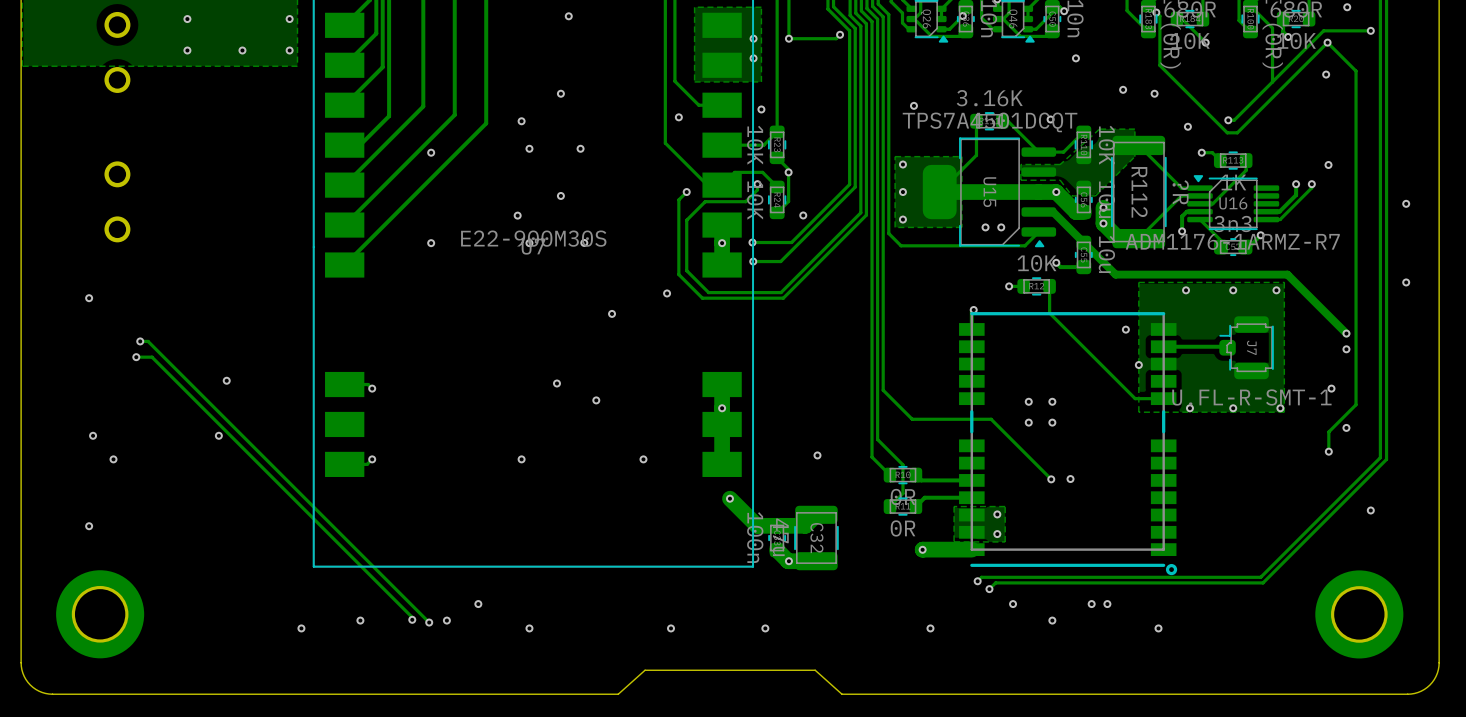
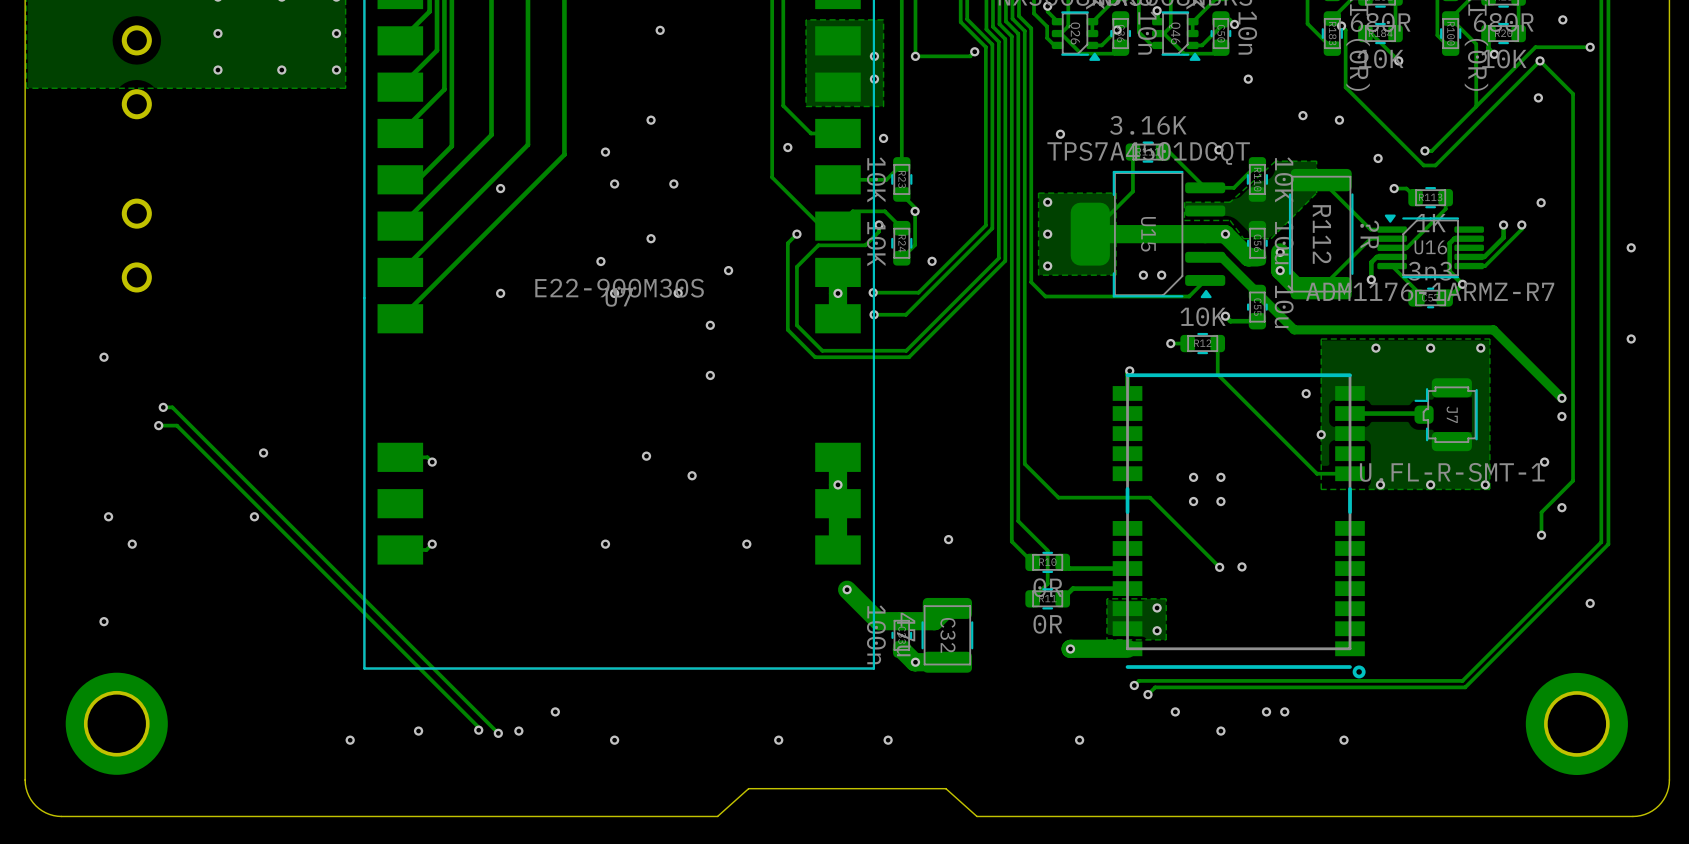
track: none -> (1469, 238) (1454, 238) (1449, 243) (1449, 271) (1462, 284)
via: none -> (728, 270)
via: none -> (710, 325)
via: (667, 293) -> none

